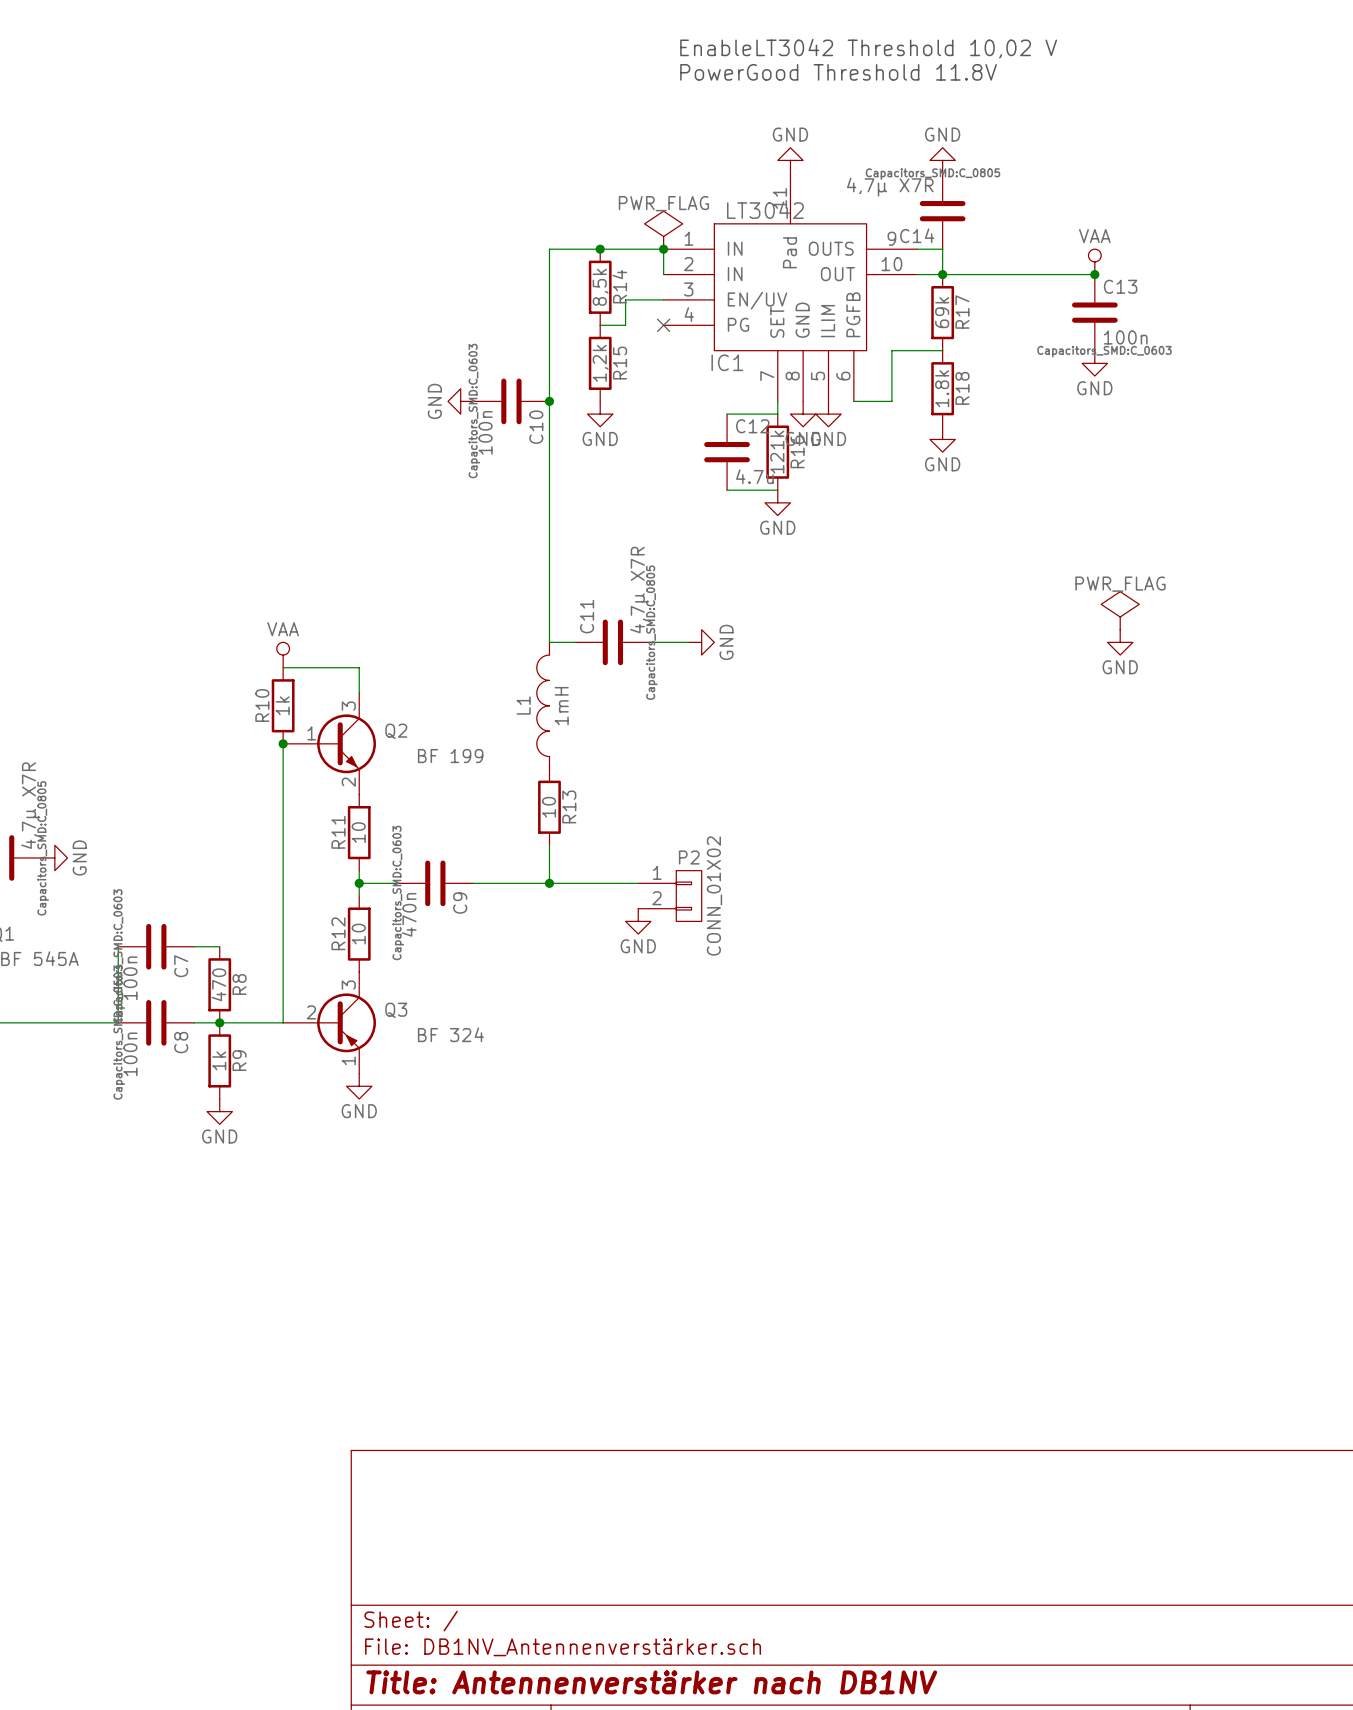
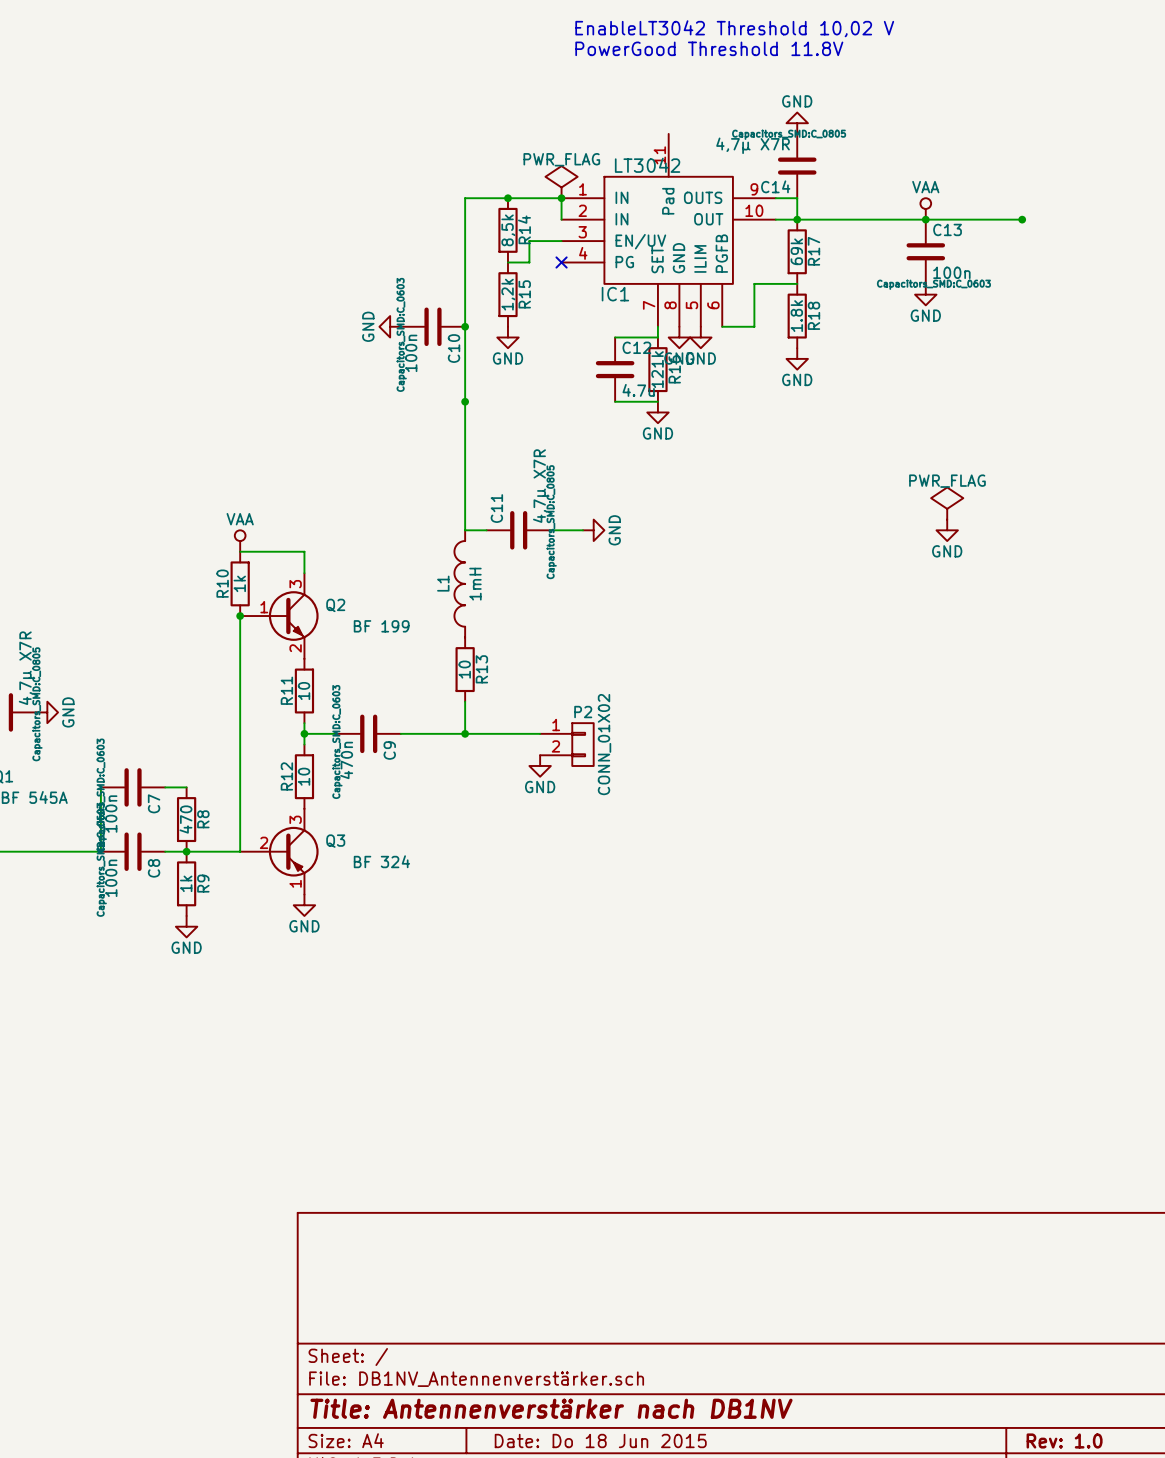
power symbol: GND (790, 160) -> none
wire: none -> (925, 219) (1022, 219)
junction: none -> (1022, 219)
junction: none -> (465, 401)

